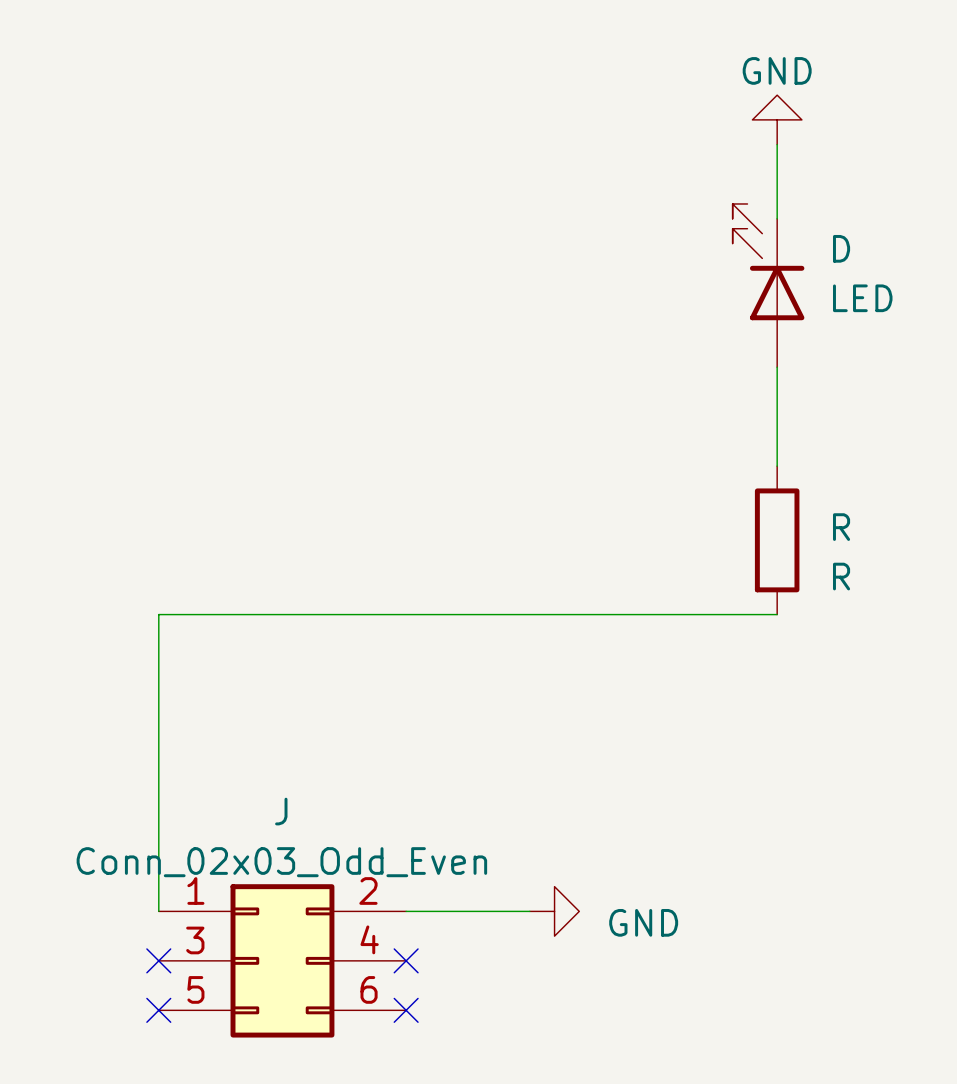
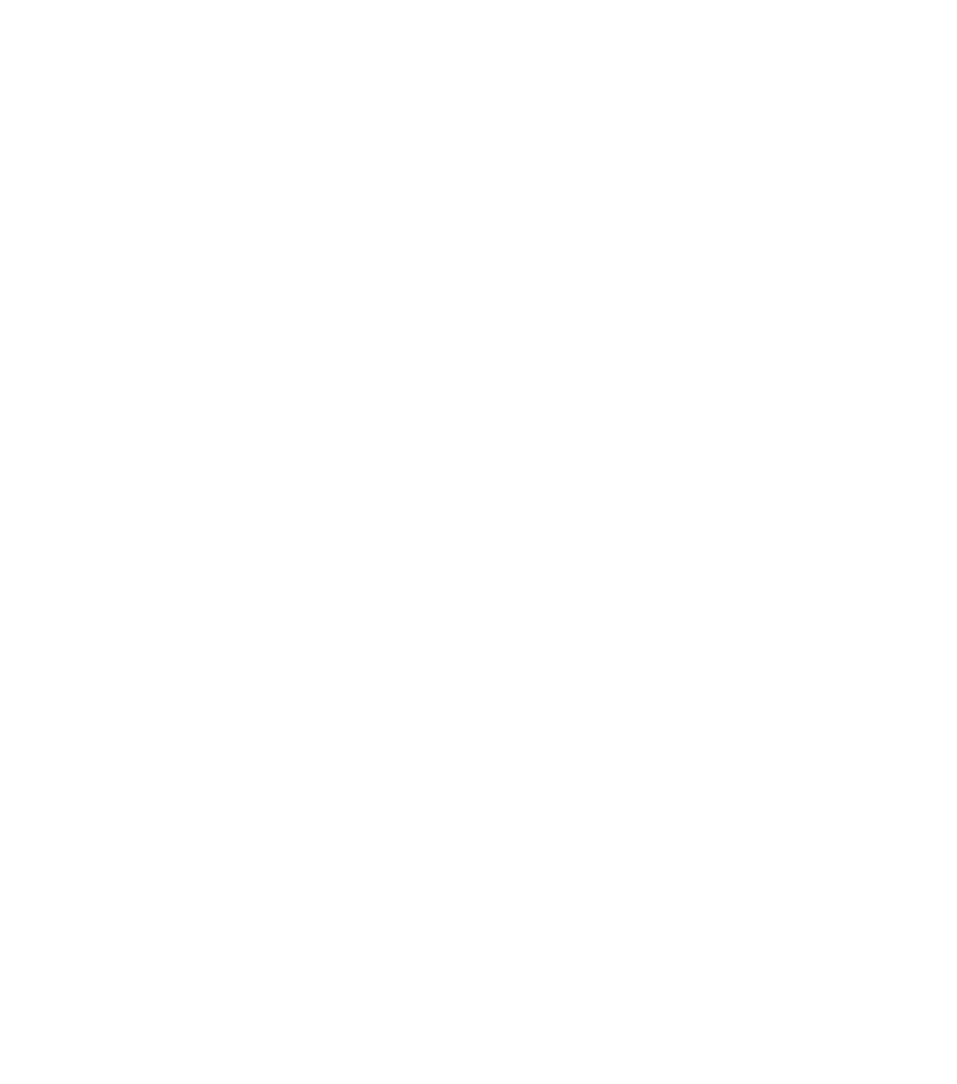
power symbol: GND (777, 119) -> none
wire: (777, 144) (777, 218) -> none
D: LED (768, 285) -> none
wire: (777, 367) (777, 466) -> none
R: R (777, 540) -> none
wire: (777, 614) (158, 614) (158, 911) -> none
wire: (406, 911) (529, 911) -> none
power symbol: GND (554, 911) -> none
no-connect mark: (158, 960) -> none
J: Conn_02x03_Odd_Even (282, 960) -> none
no-connect mark: (406, 960) -> none
no-connect mark: (158, 1010) -> none
no-connect mark: (406, 1010) -> none

